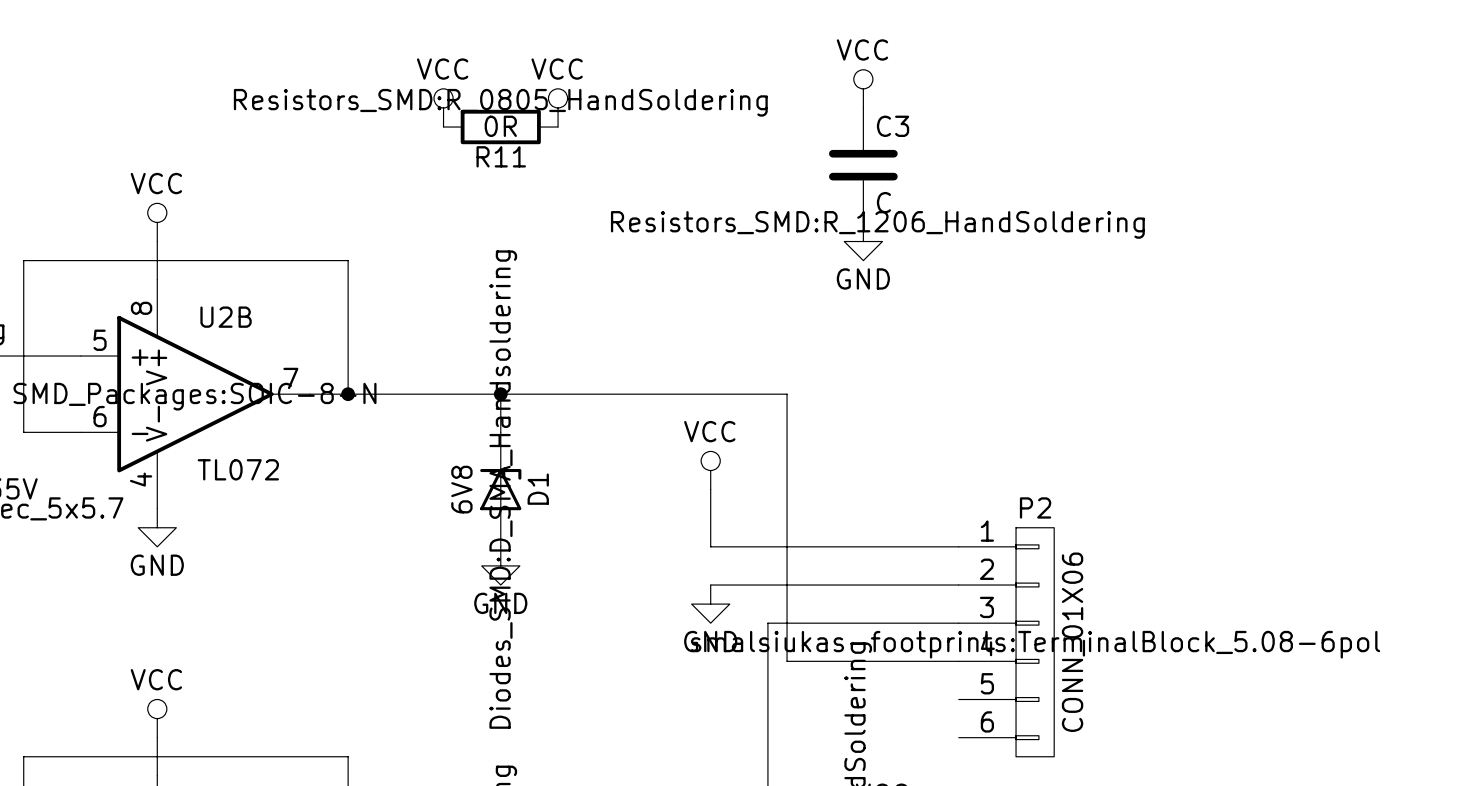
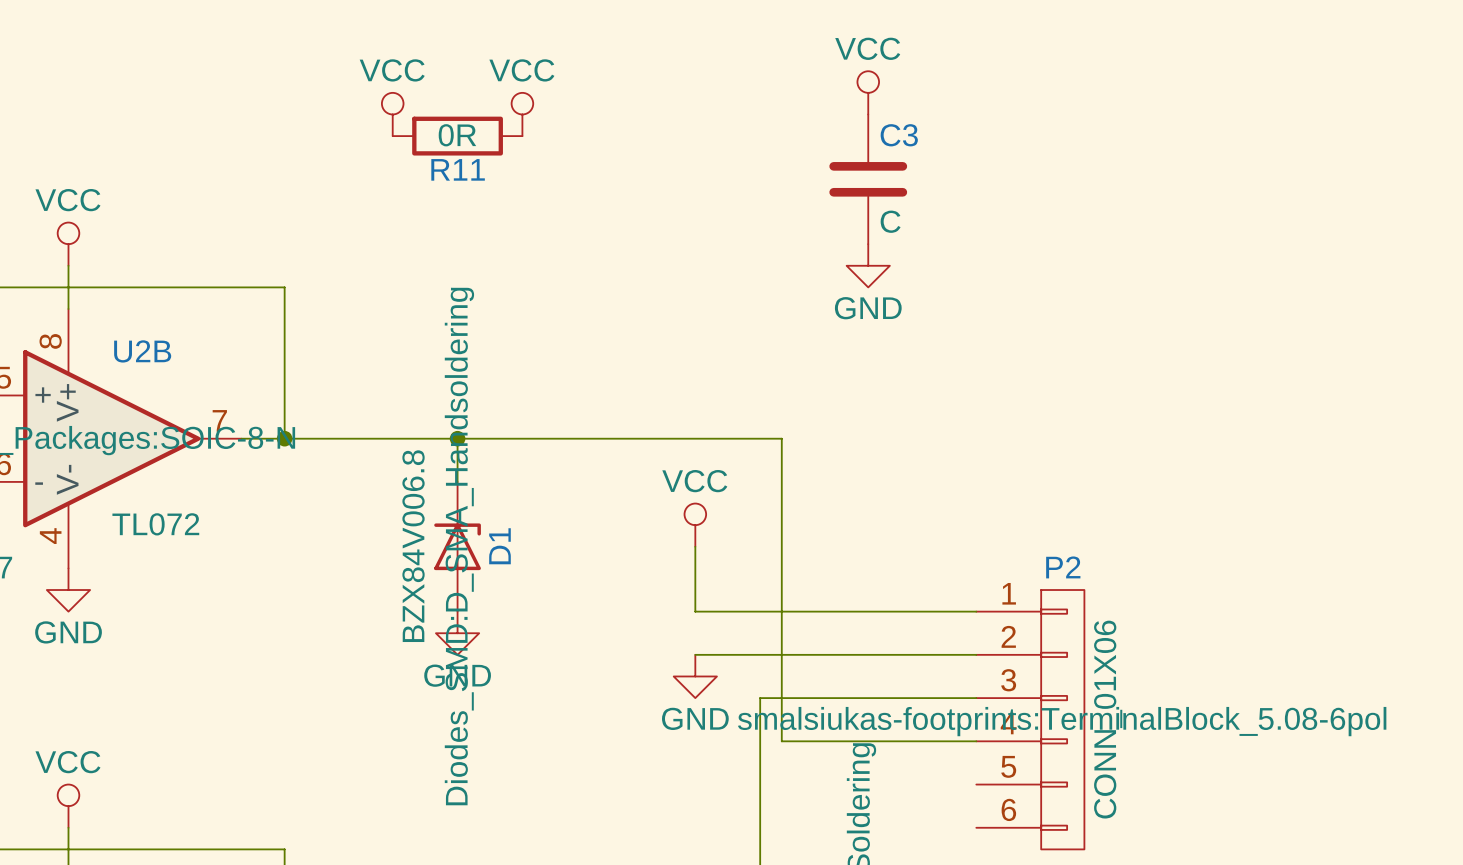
R11 text: Resistors_SMD:R_0805_HandSoldering (500, 102) -> none
C3 text: Resistors_SMD:R_1206_HandSoldering (877, 224) -> none
D1 value: 6V8 (461, 489) -> BZX84V006.8 (413, 546)

